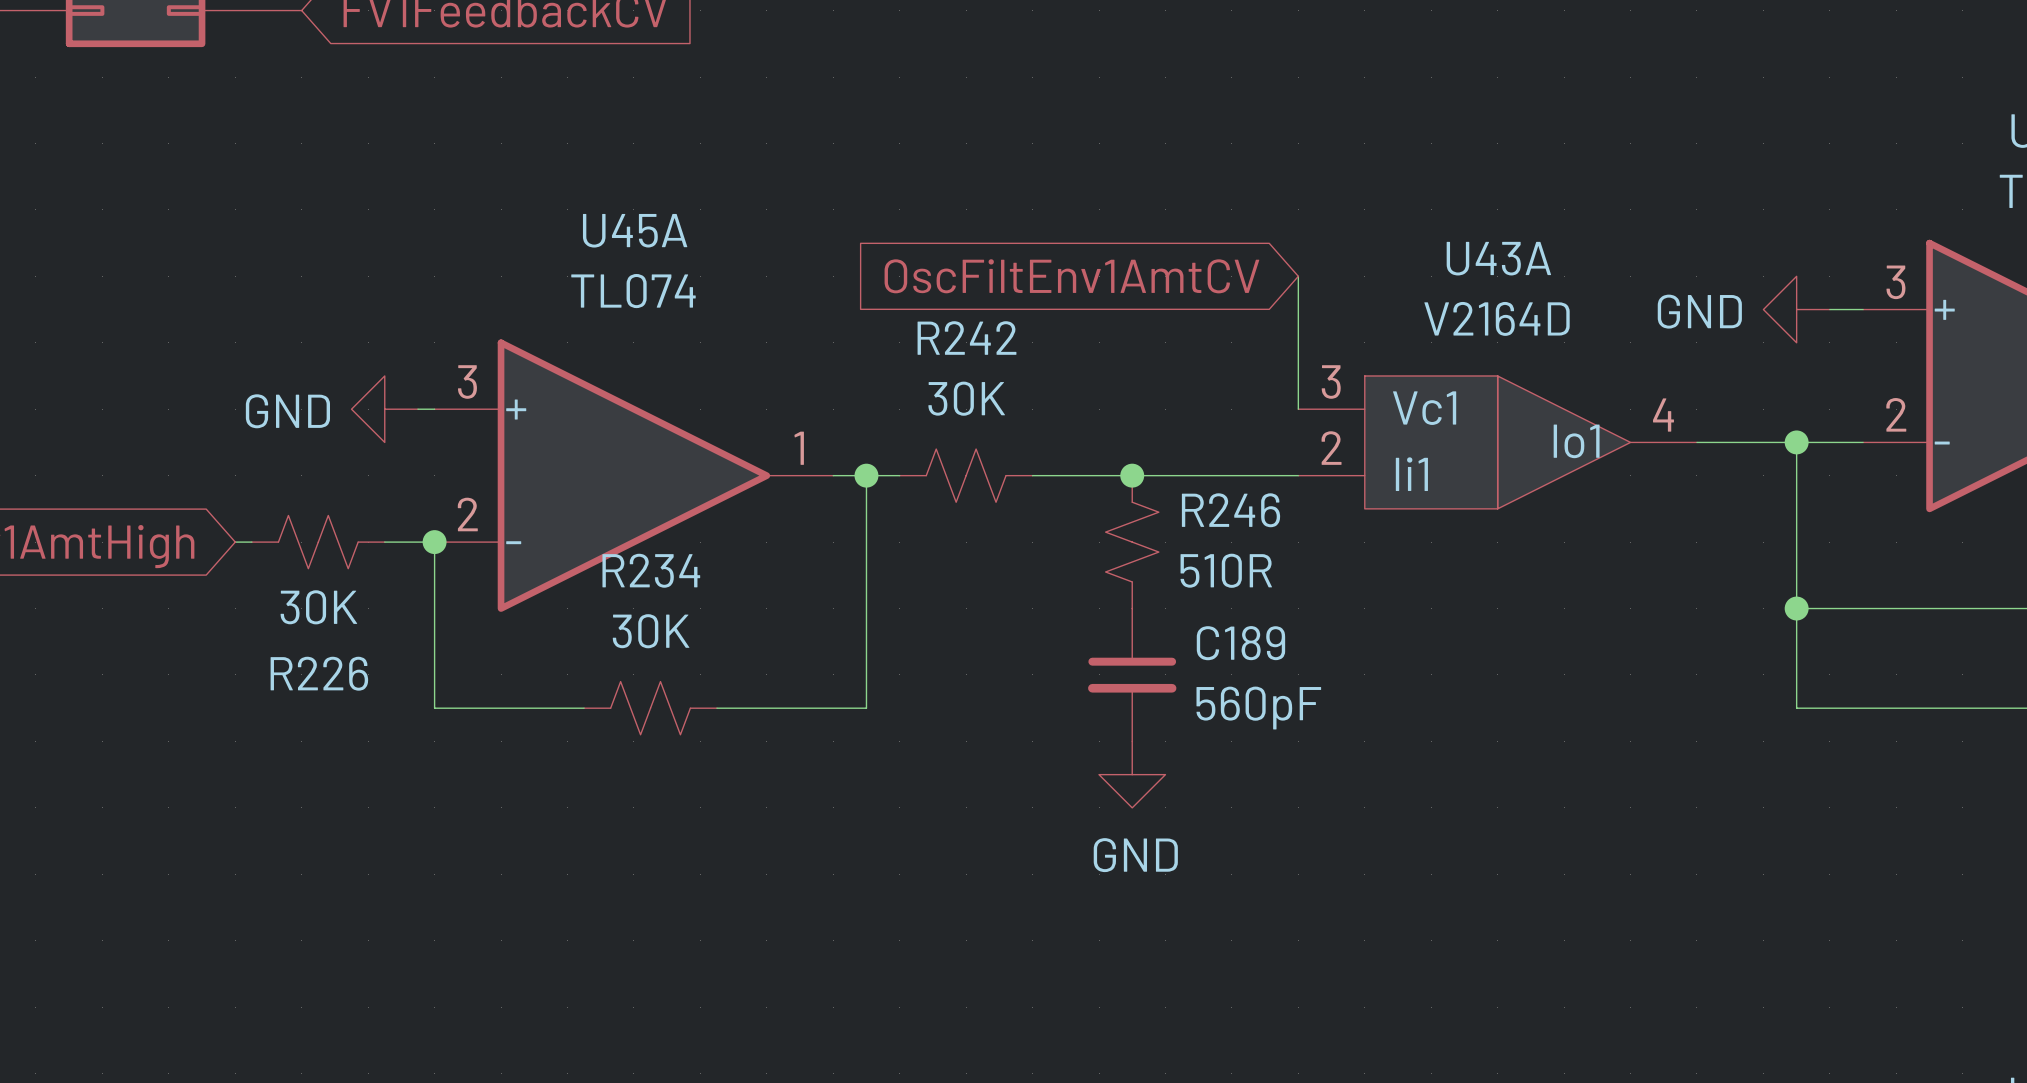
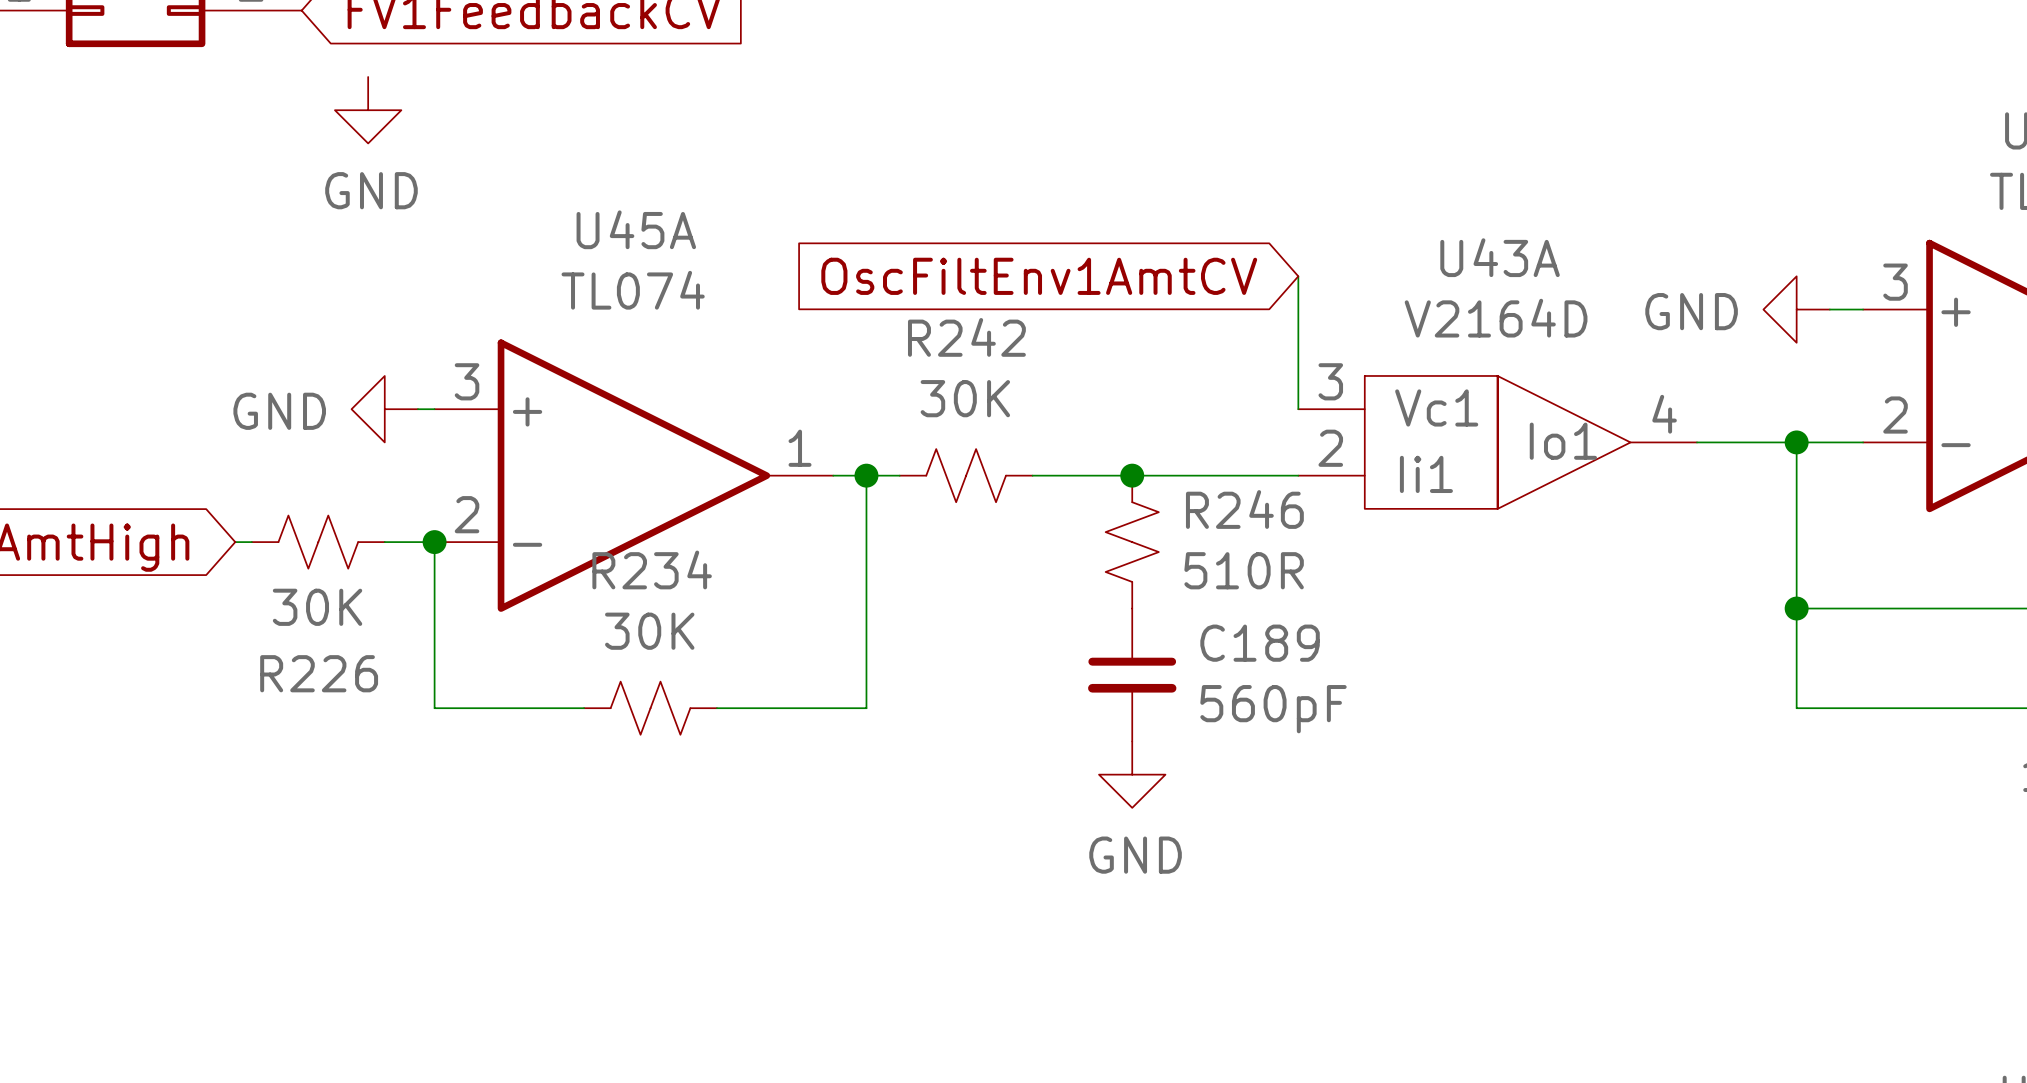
power symbol: none -> GND (368, 110)

